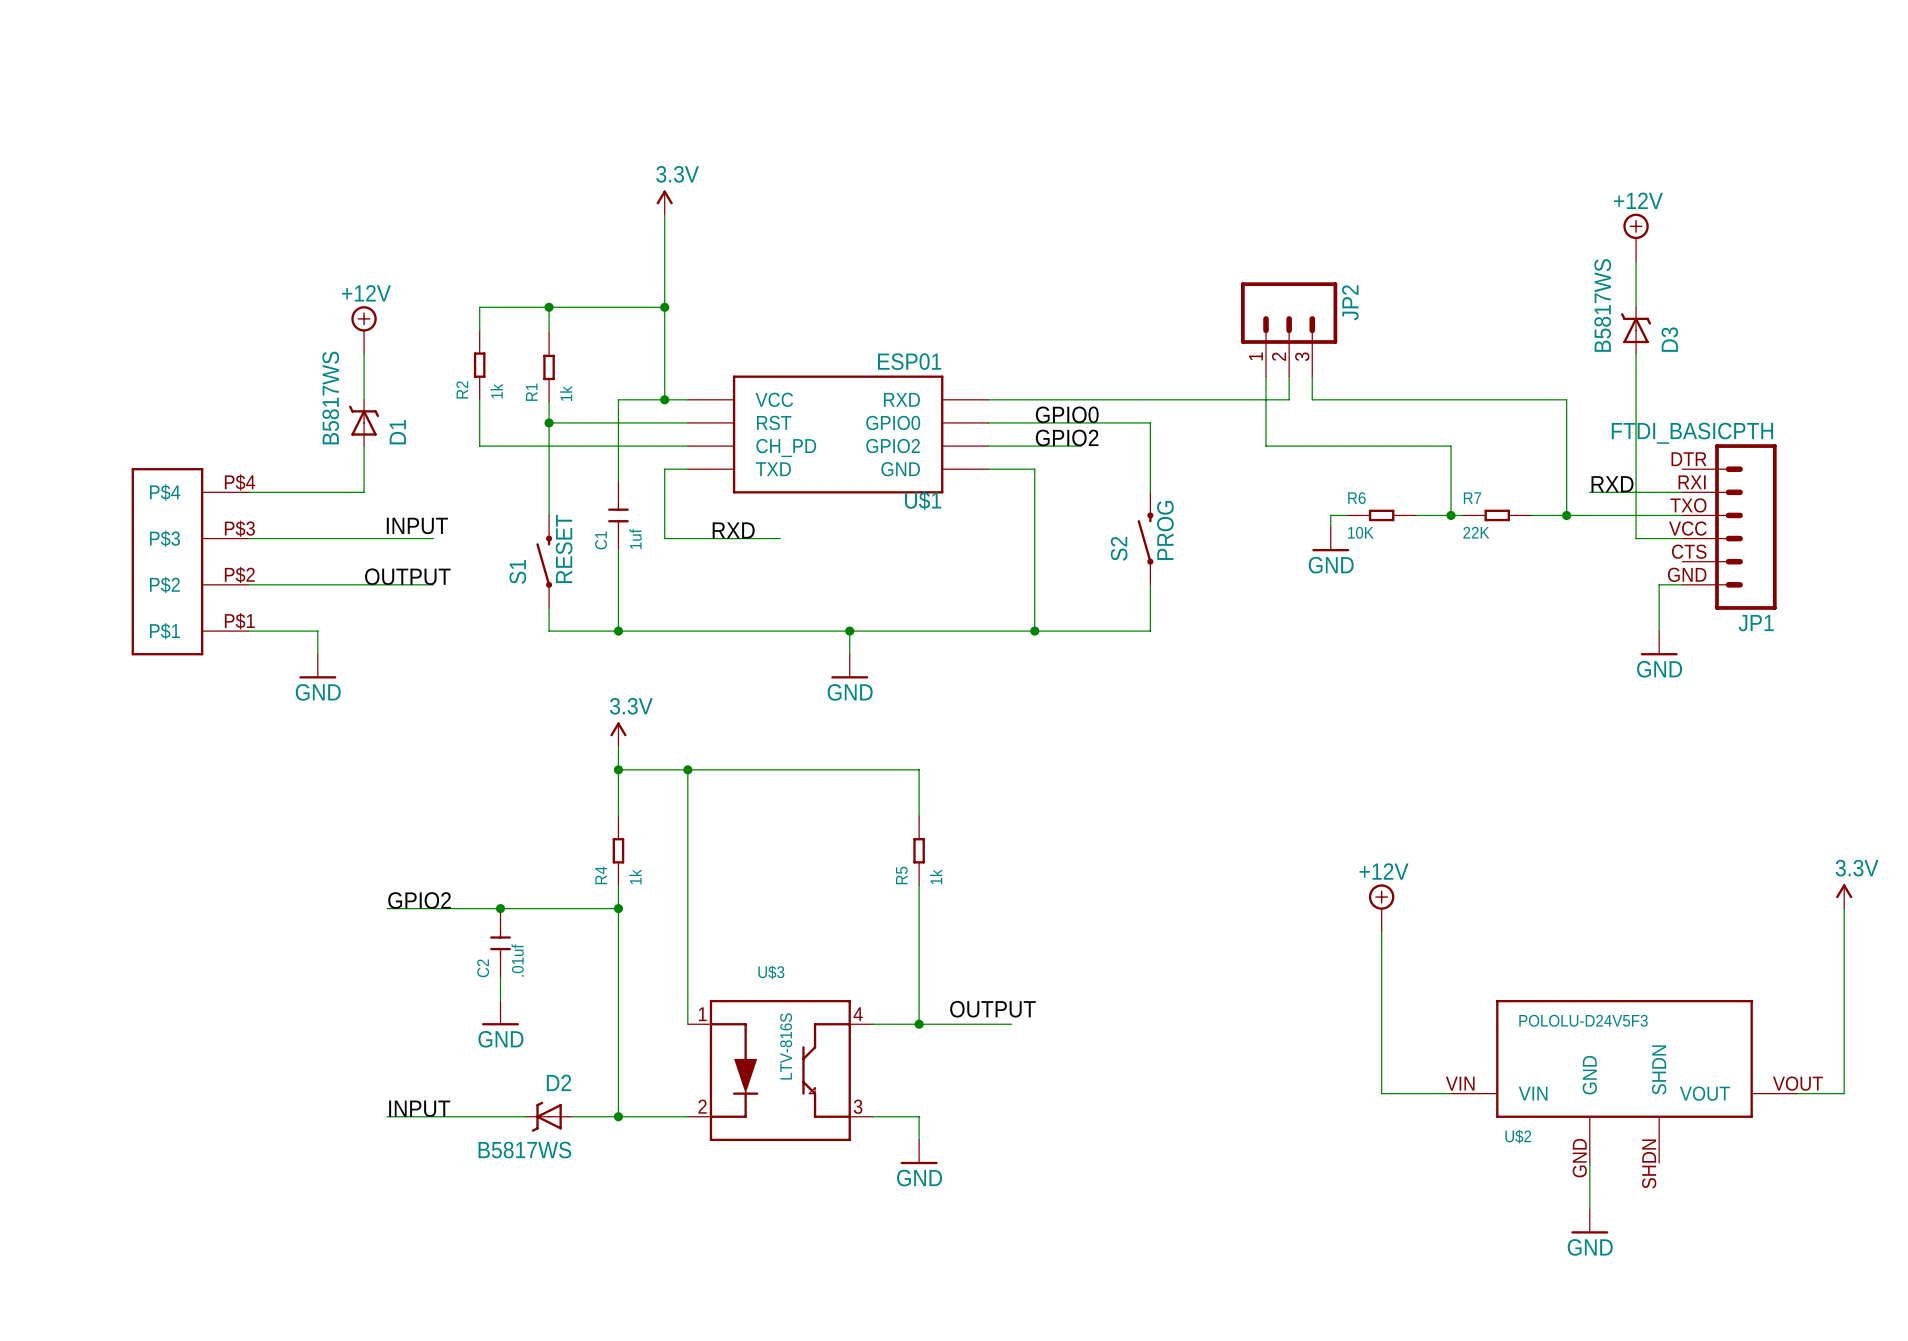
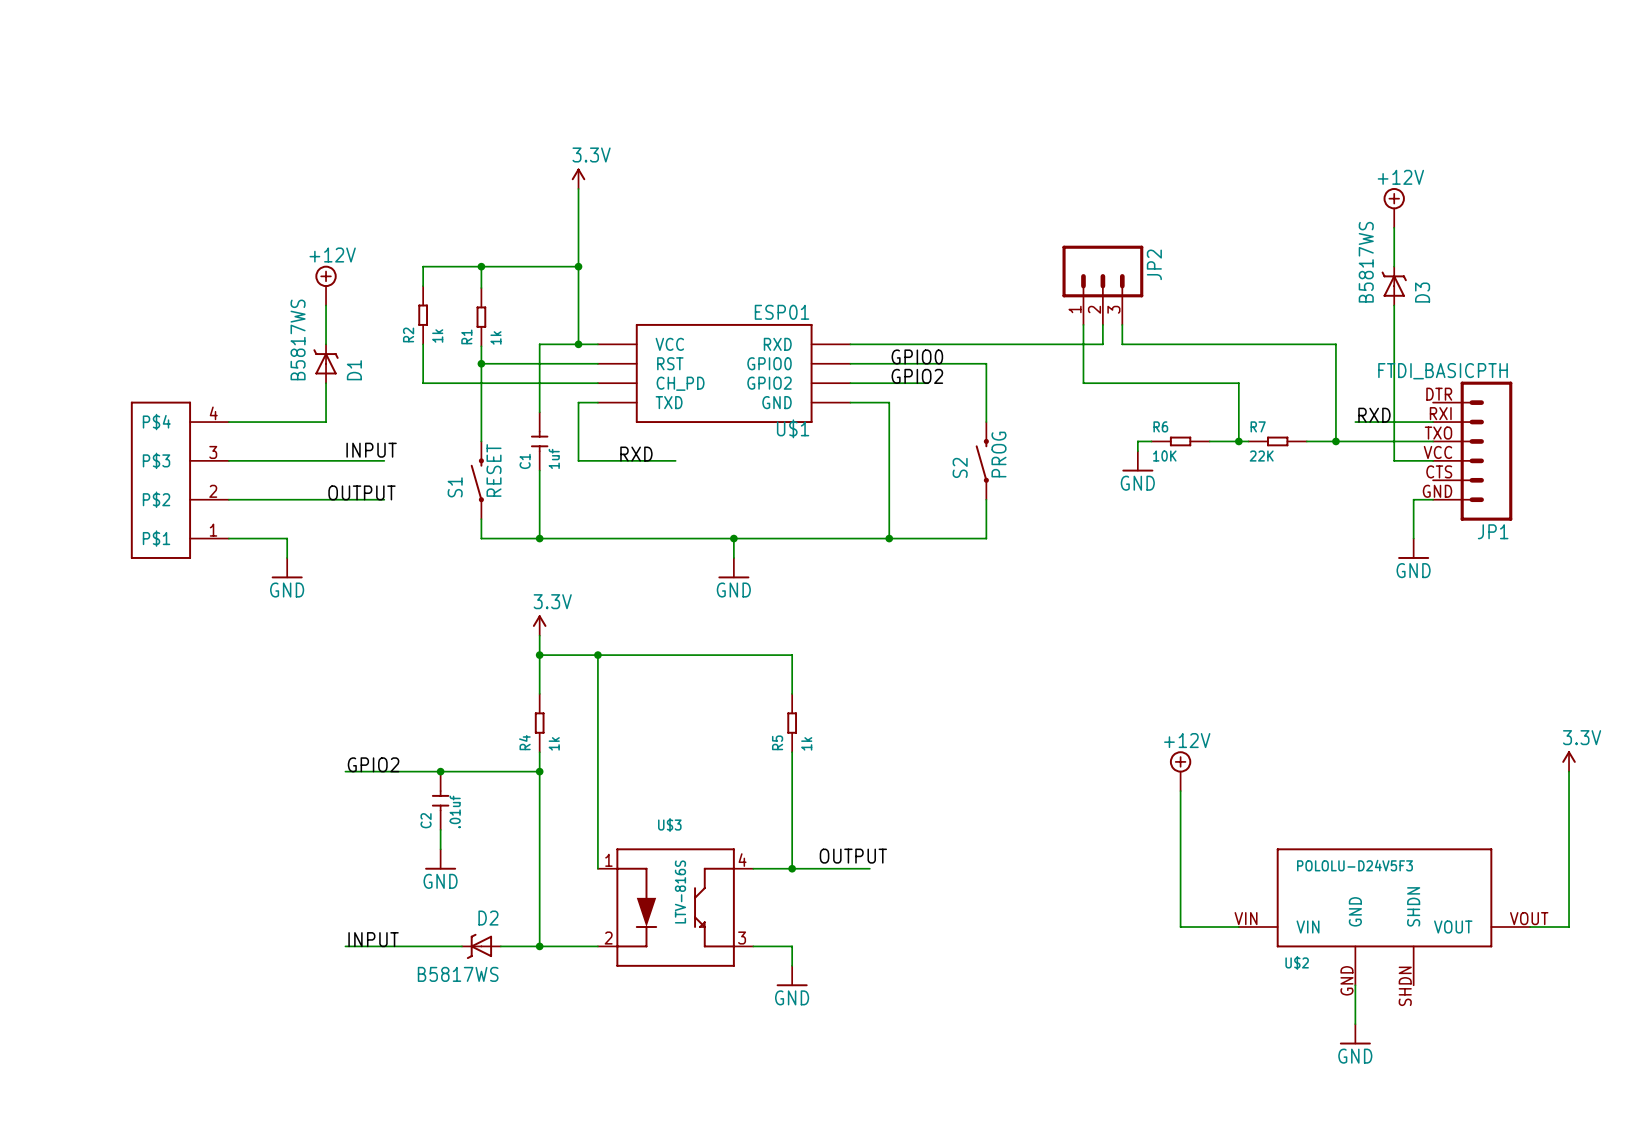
part pin number: P$4 (240, 482) -> 4 (213, 413)
part pin number: P$3 (239, 528) -> 3 (213, 452)
part pin number: P$2 (239, 574) -> 2 (213, 491)
part pin number: P$1 (239, 621) -> 1 (213, 530)

